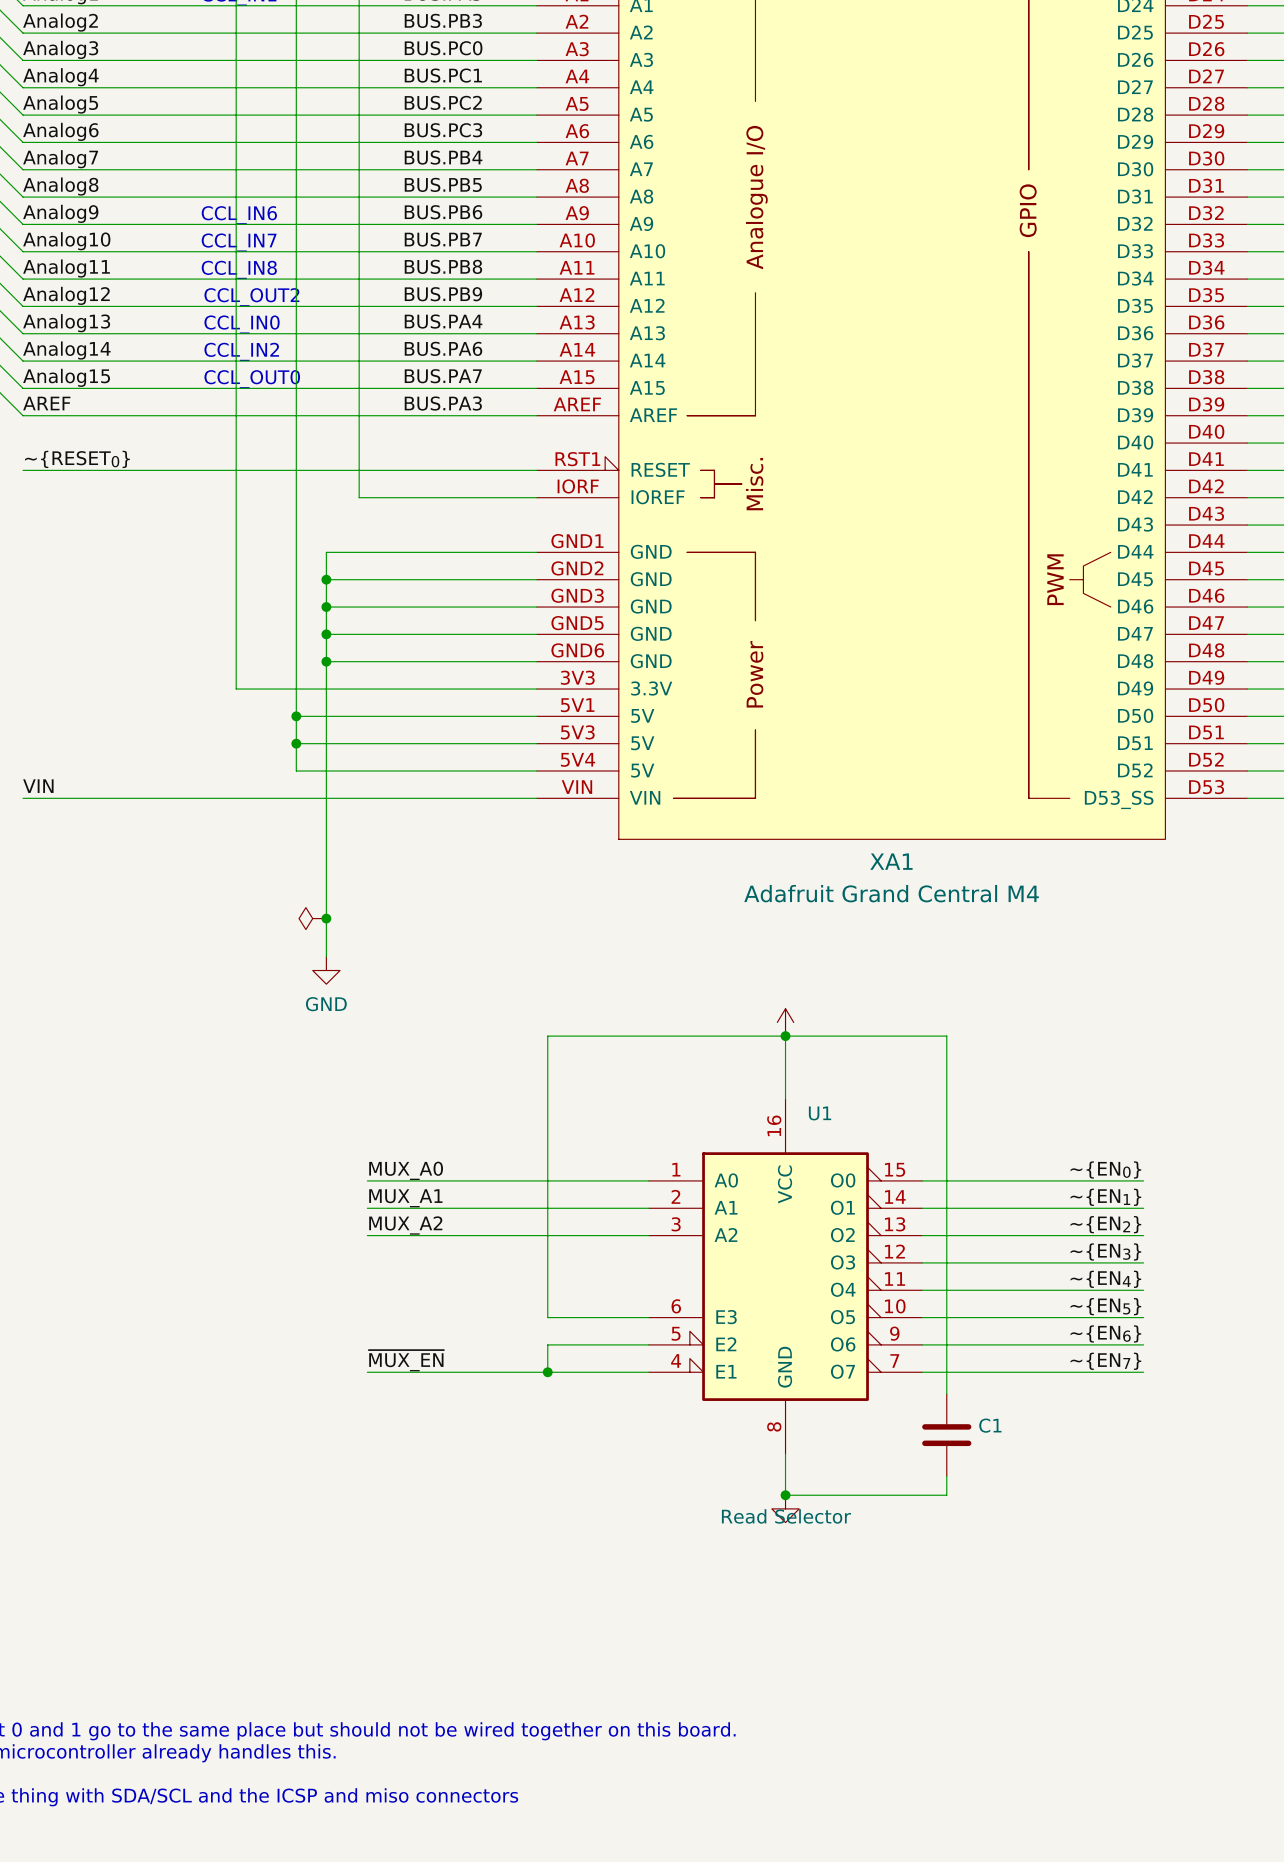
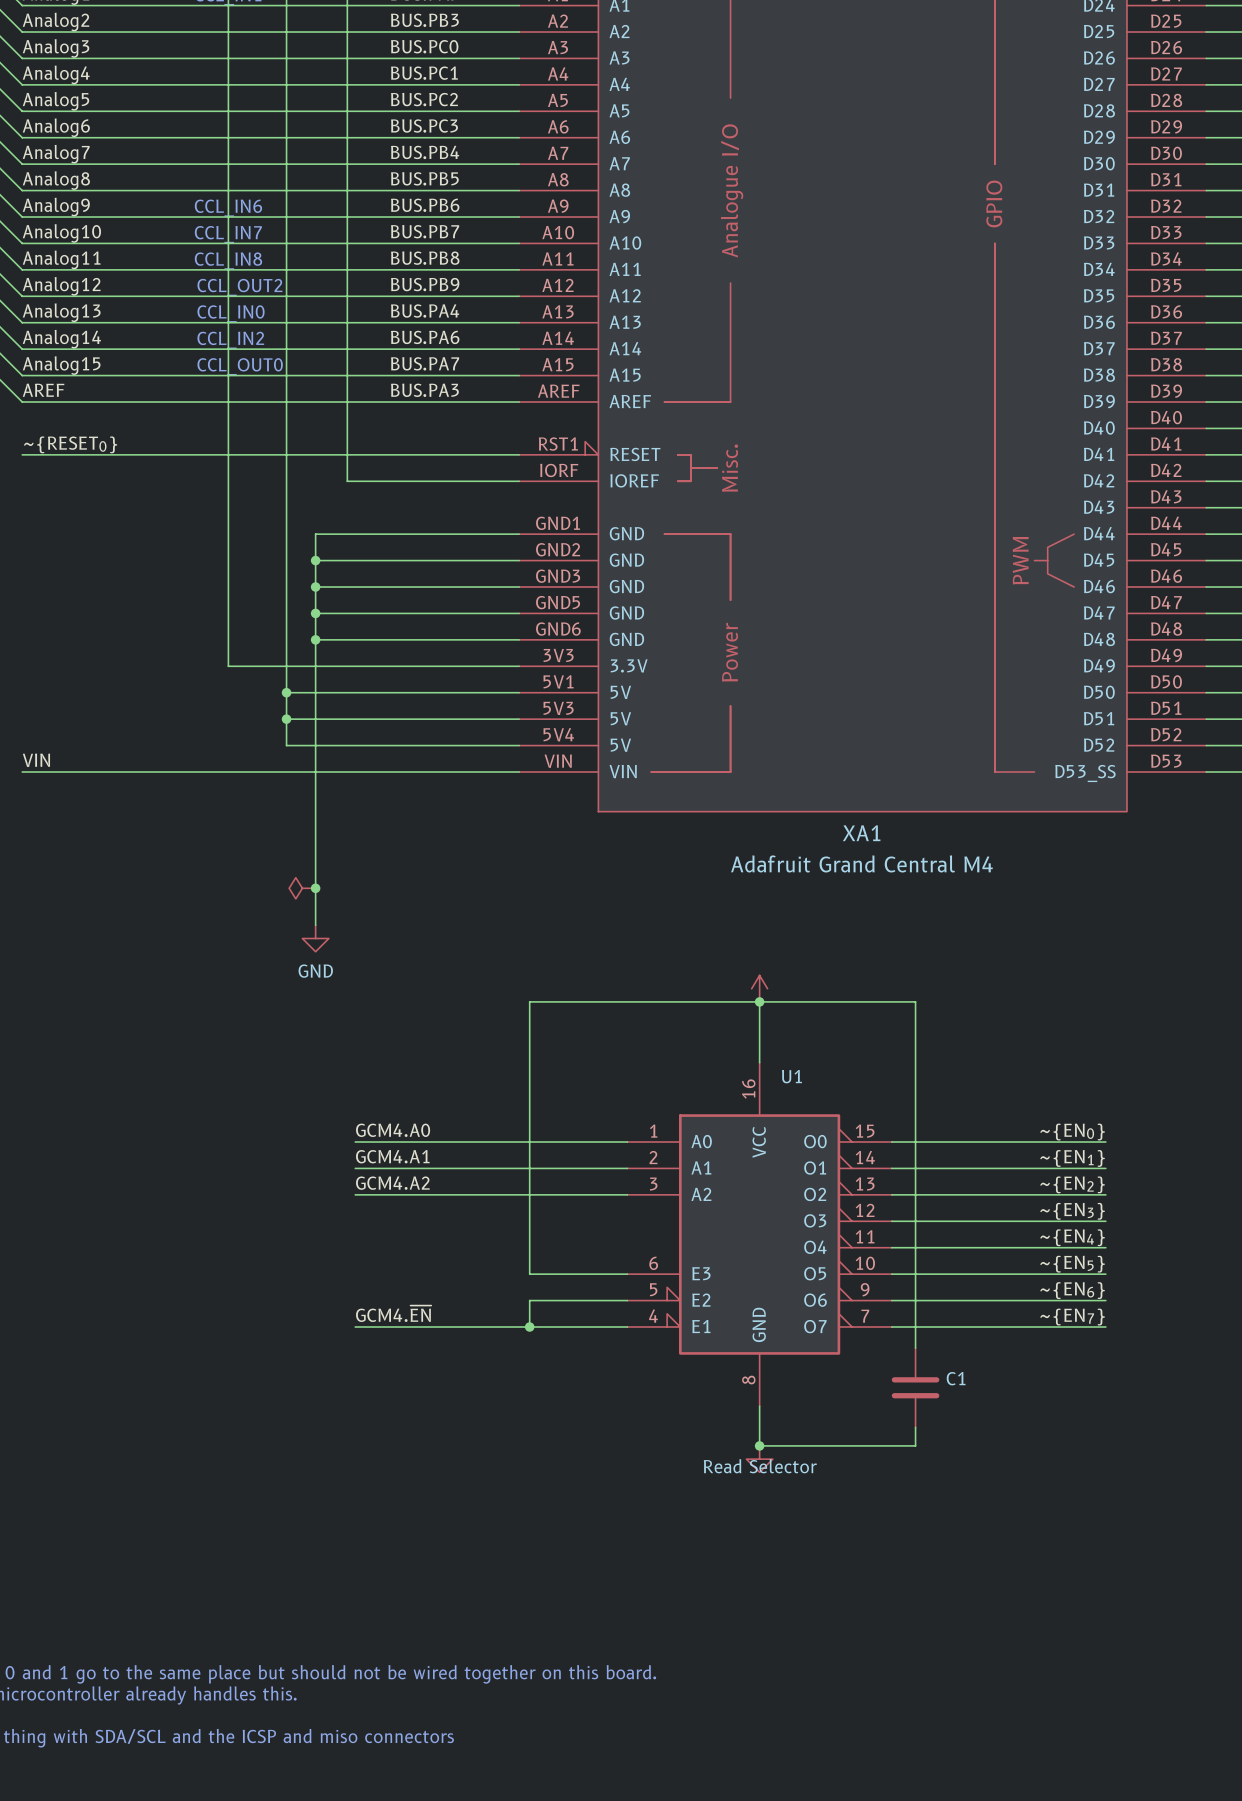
label: MUX_A0 (406, 1170) -> GCM4.A0 (393, 1130)
label: MUX_A1 (405, 1198) -> GCM4.A1 (392, 1156)
label: MUX_A2 (405, 1225) -> GCM4.A2 (392, 1183)
label: ~{MUX_EN} (406, 1360) -> GCM4.~{EN} (393, 1313)

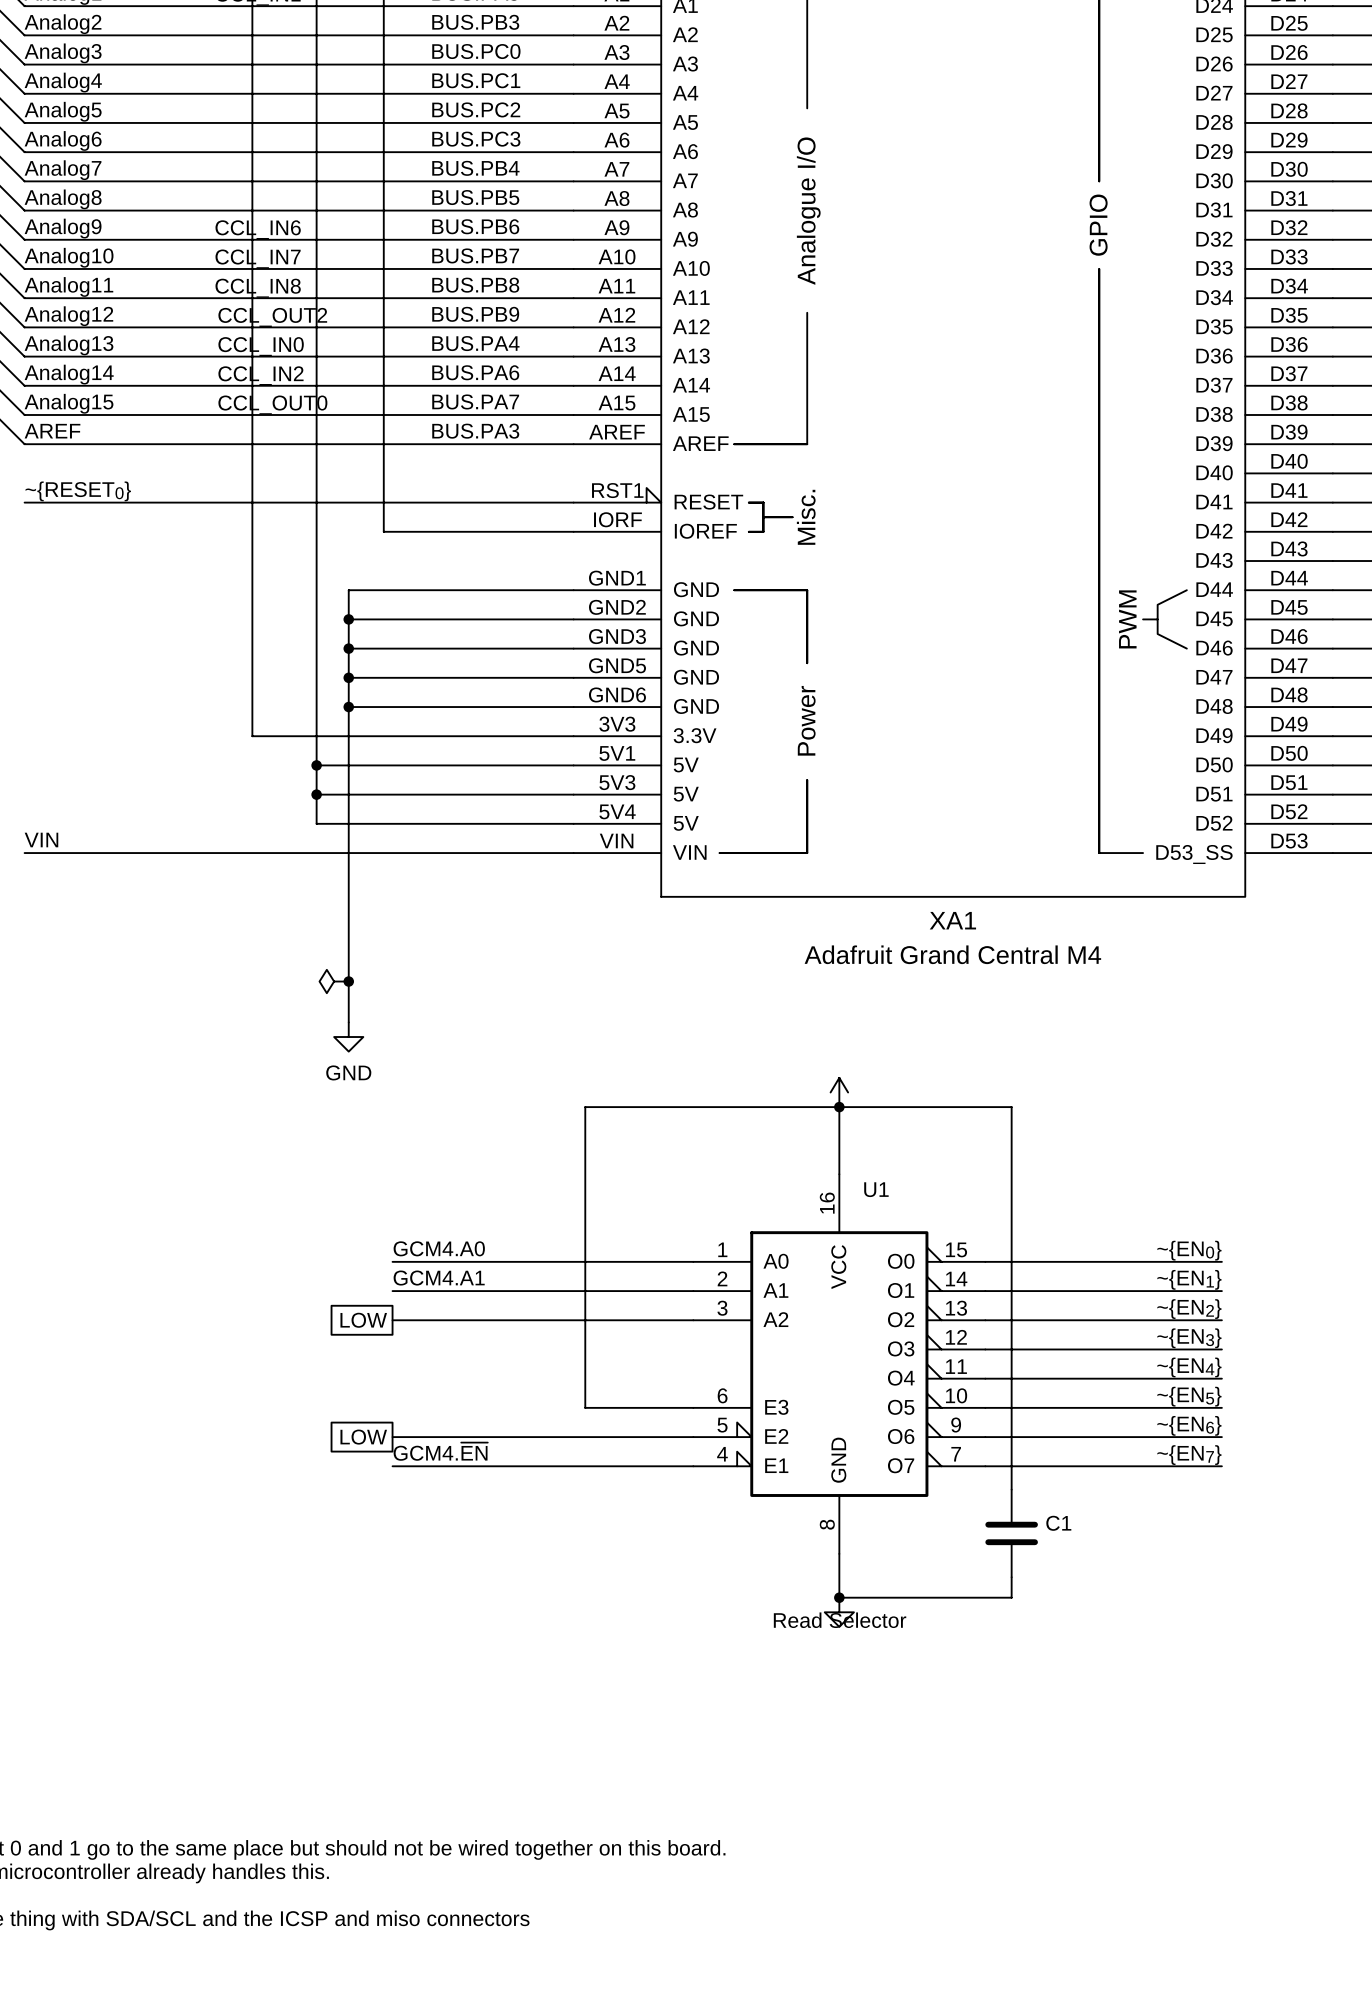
label: GCM4.A2 (392, 1183) -> none
global label: none -> LOW (363, 1320)
global label: none -> LOW (363, 1437)
wire: (529, 1300) (529, 1327) -> (585, 1437) (392, 1437)
junction: (529, 1327) -> none

